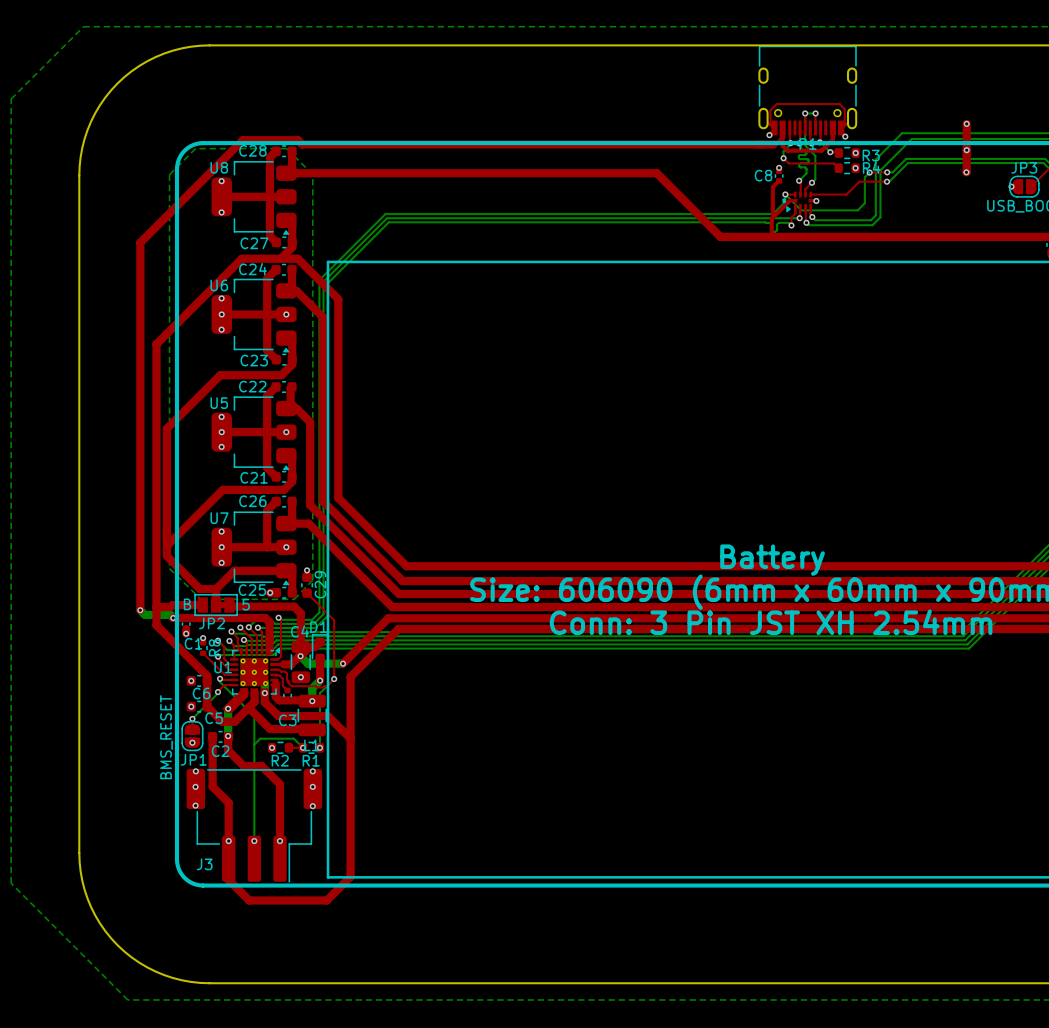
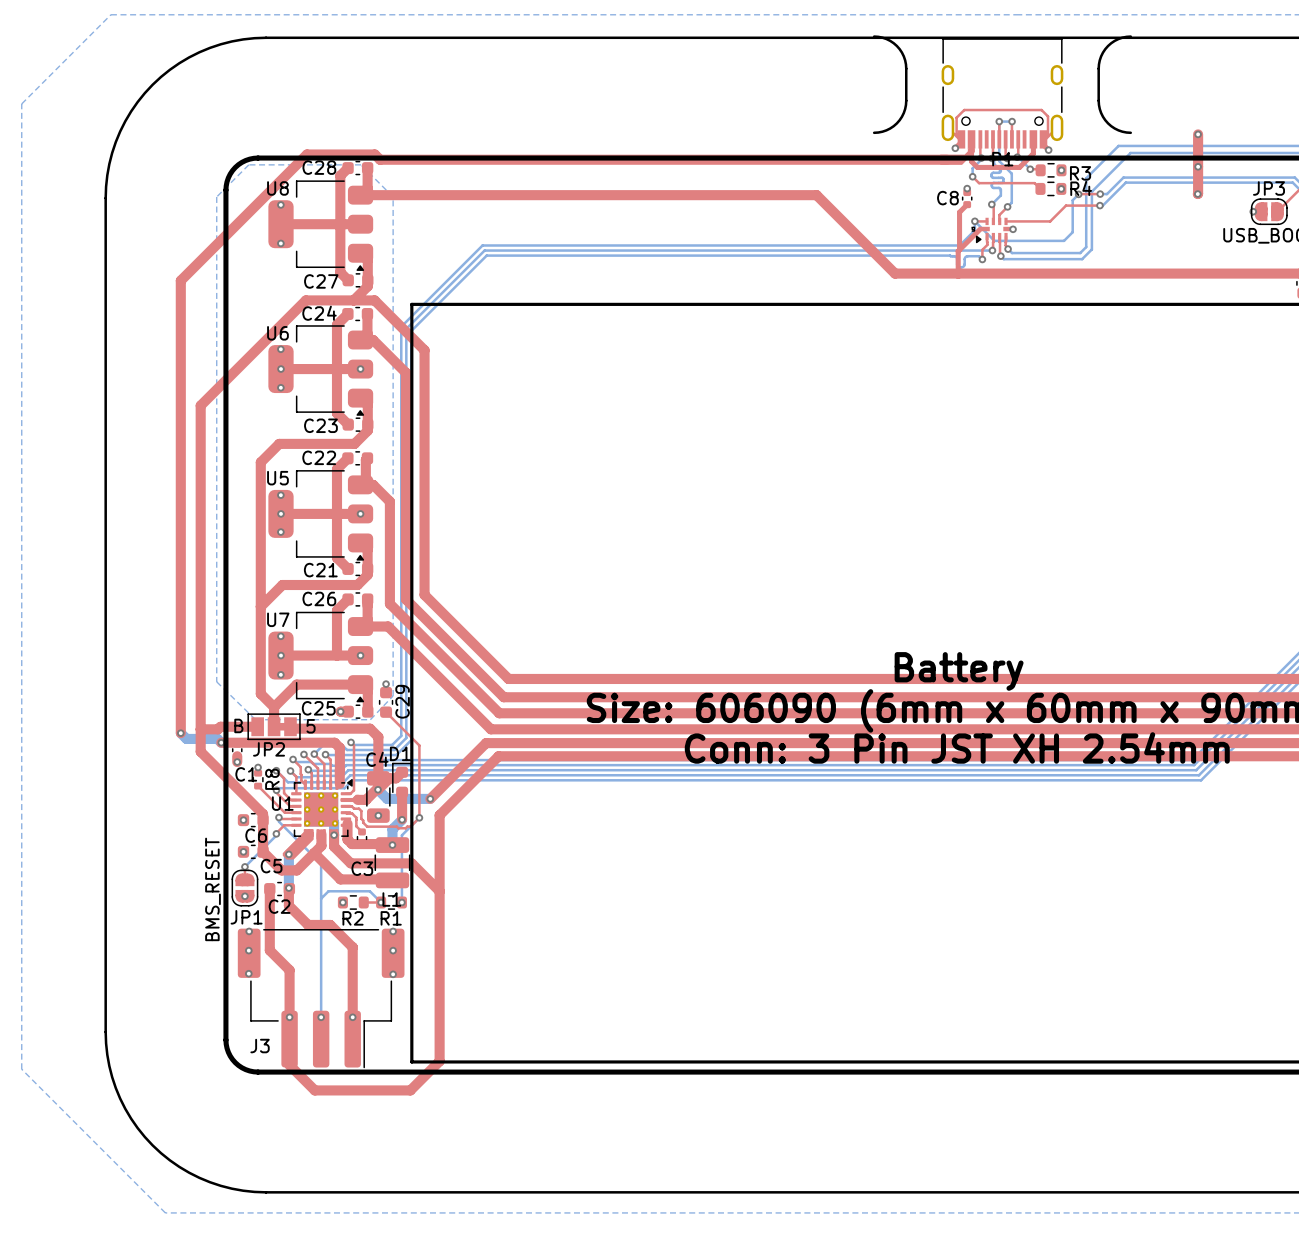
line: none -> (874, 36) (886, 39) (896, 45) (903, 56) (906, 68) (905, 104) (901, 116) (890, 128) (874, 132)
line: none -> (1130, 36) (1118, 39) (1108, 45) (1101, 56) (1098, 68) (1098, 104) (1102, 116) (1114, 128) (1130, 132)
top track: (205, 390) (166, 428) (166, 556) (199, 589) (216, 589) -> (260, 462) (260, 693) (274, 707)
top track: (205, 507) (166, 545) -> none

